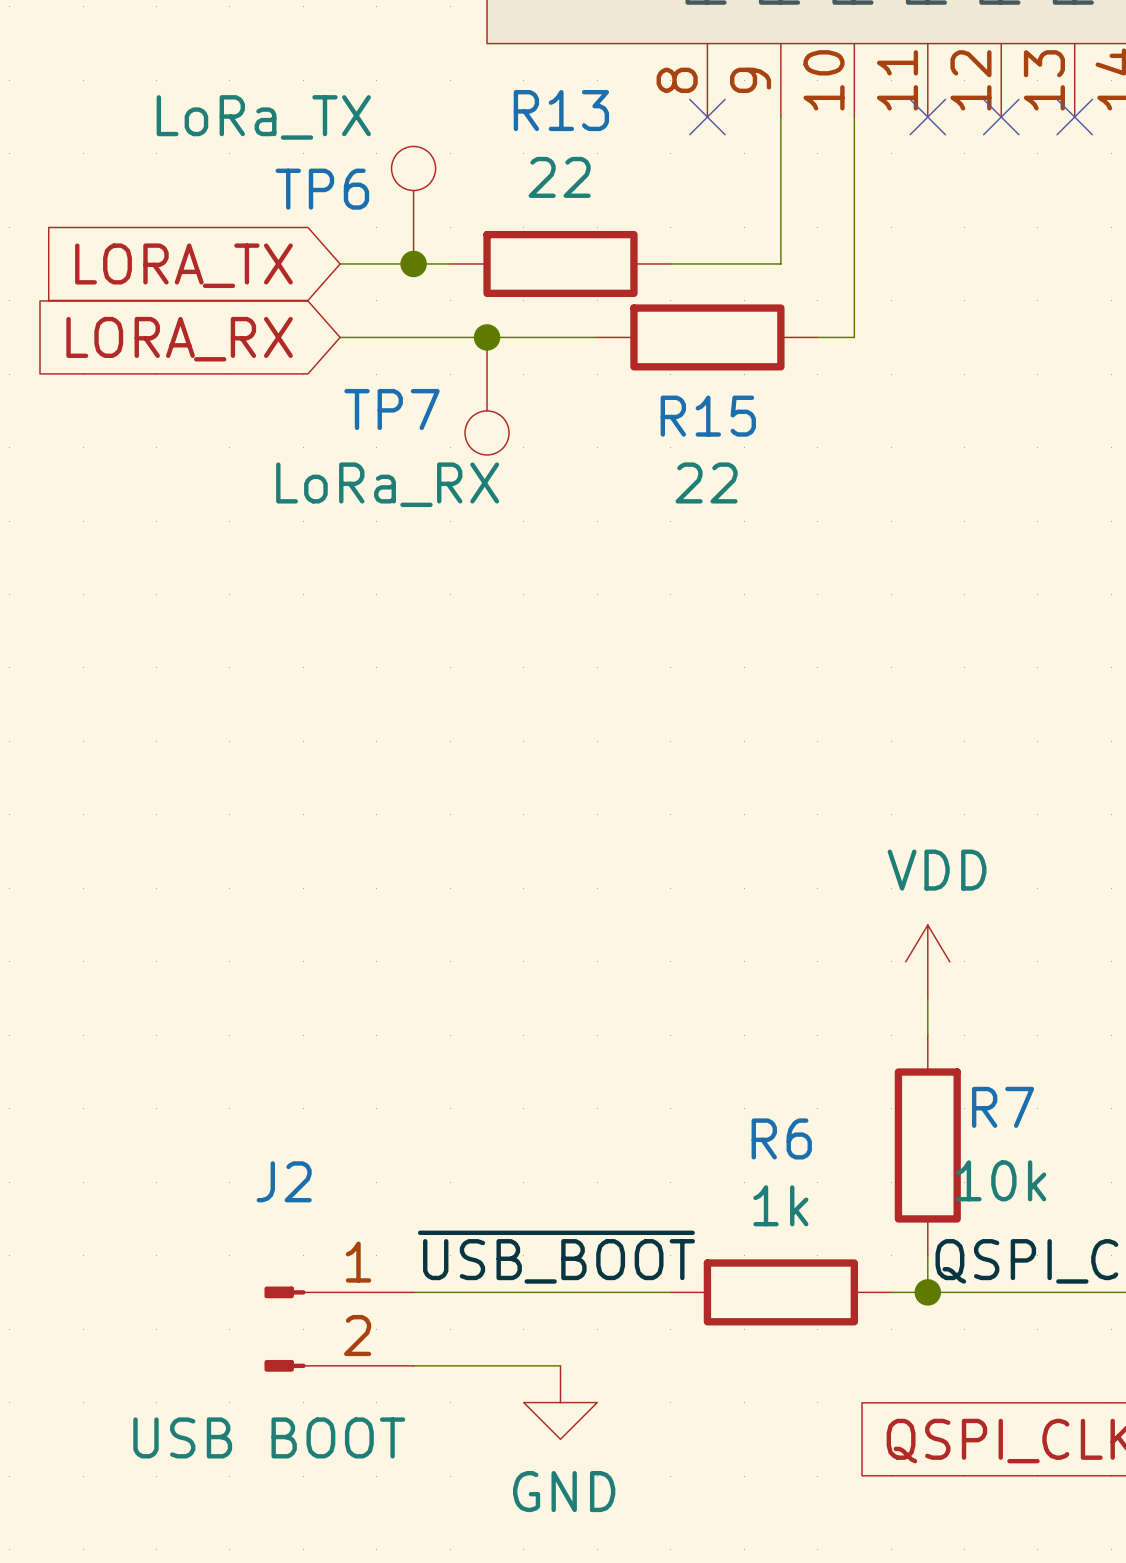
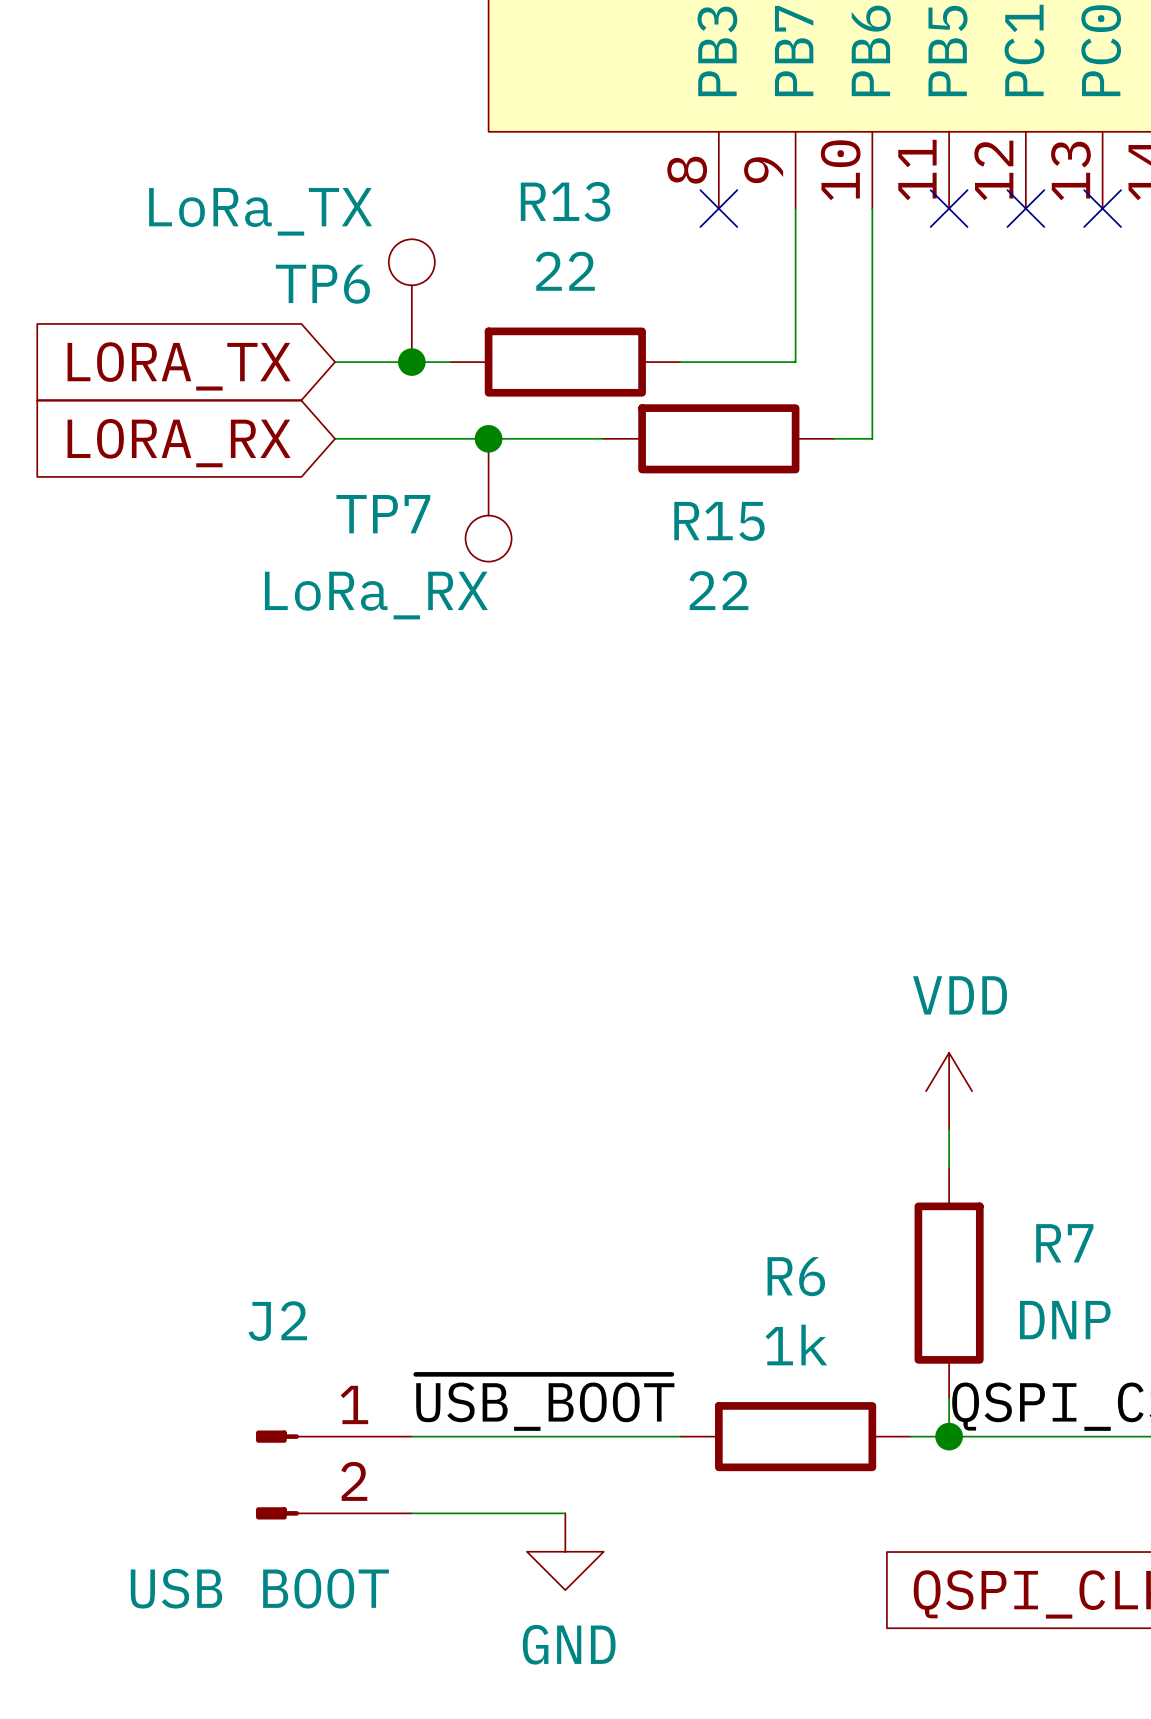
R7 name position: R7 (1003, 1107) -> R7 (1064, 1243)
R7 value: 10k (1001, 1180) -> DNP (1065, 1320)

